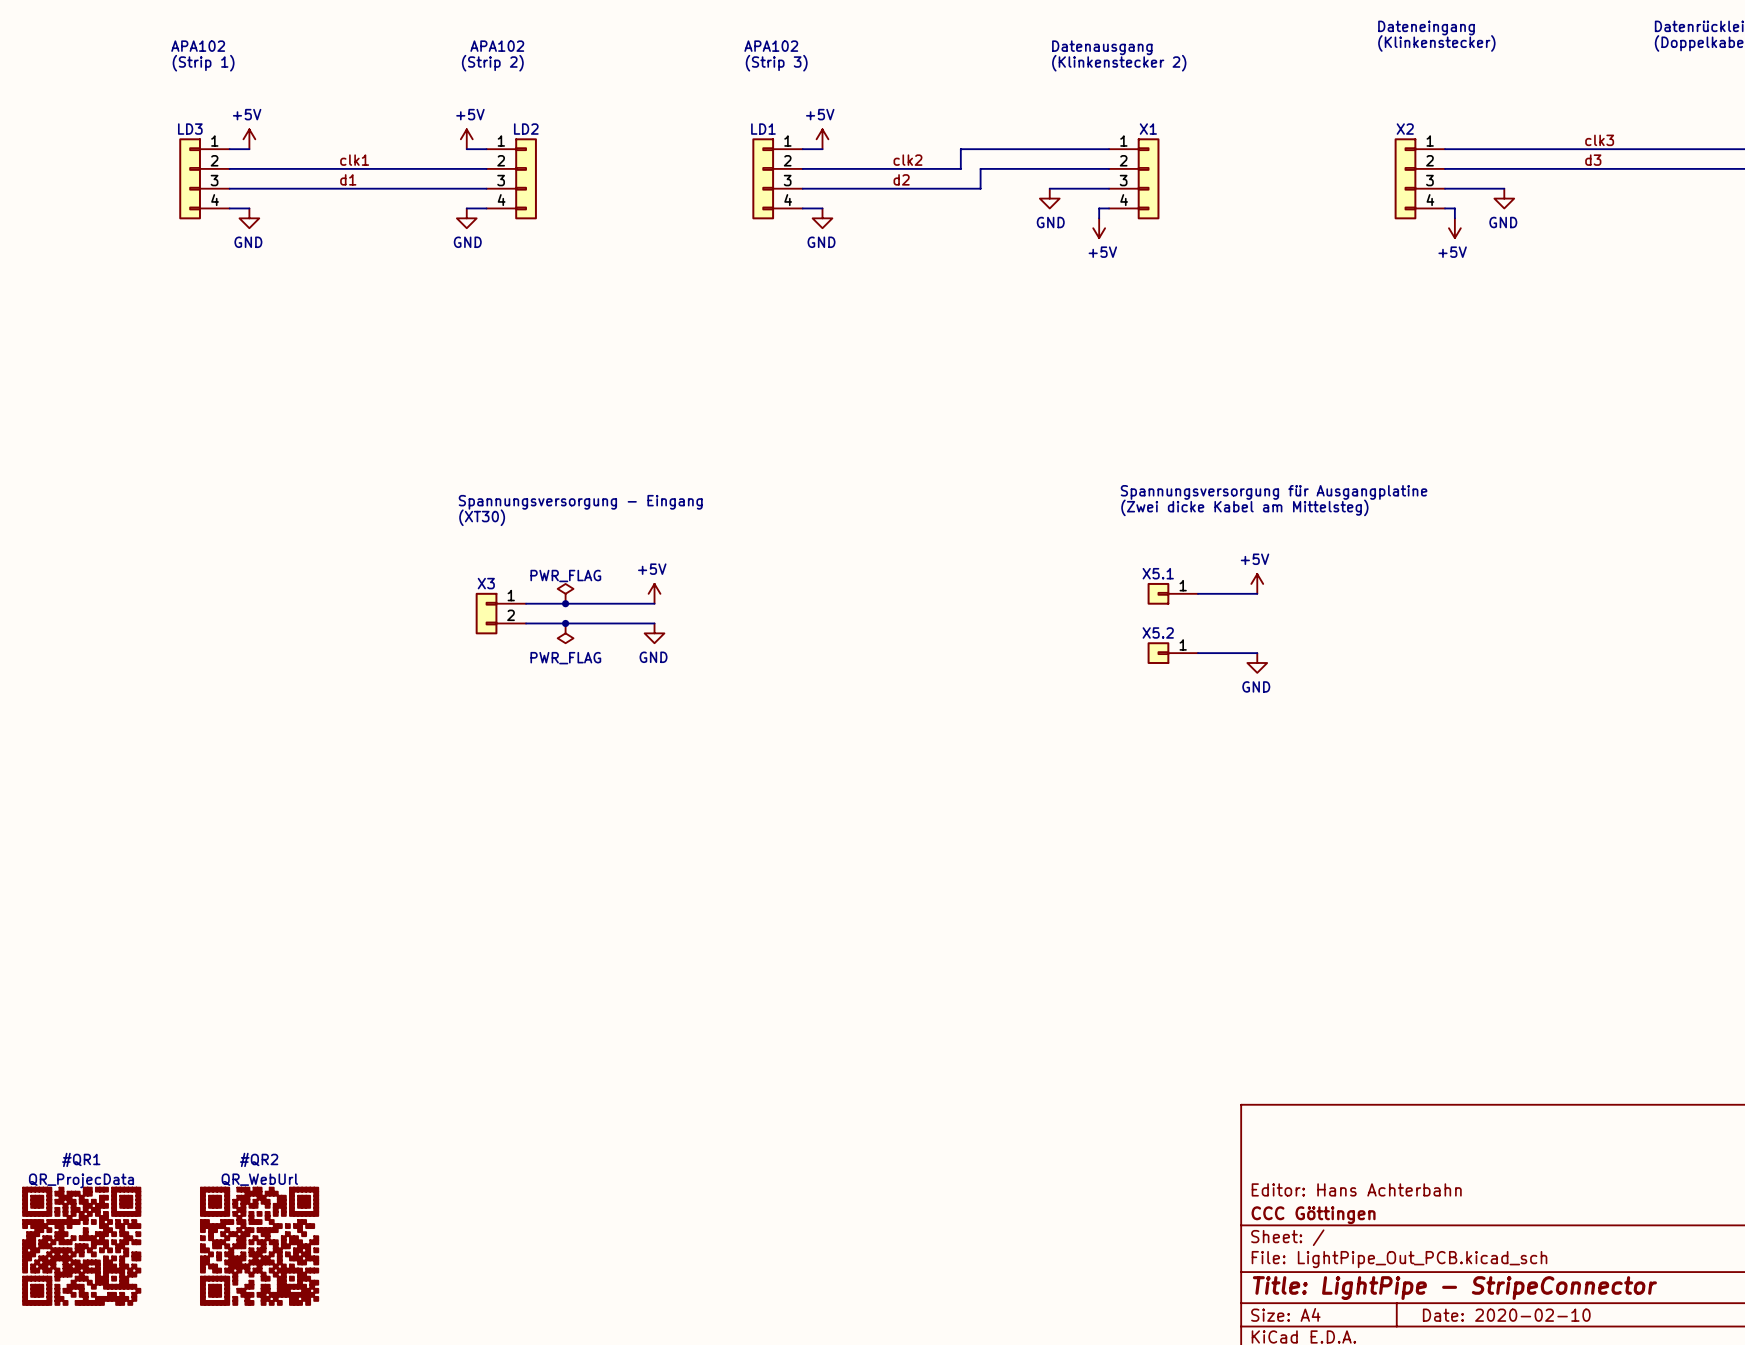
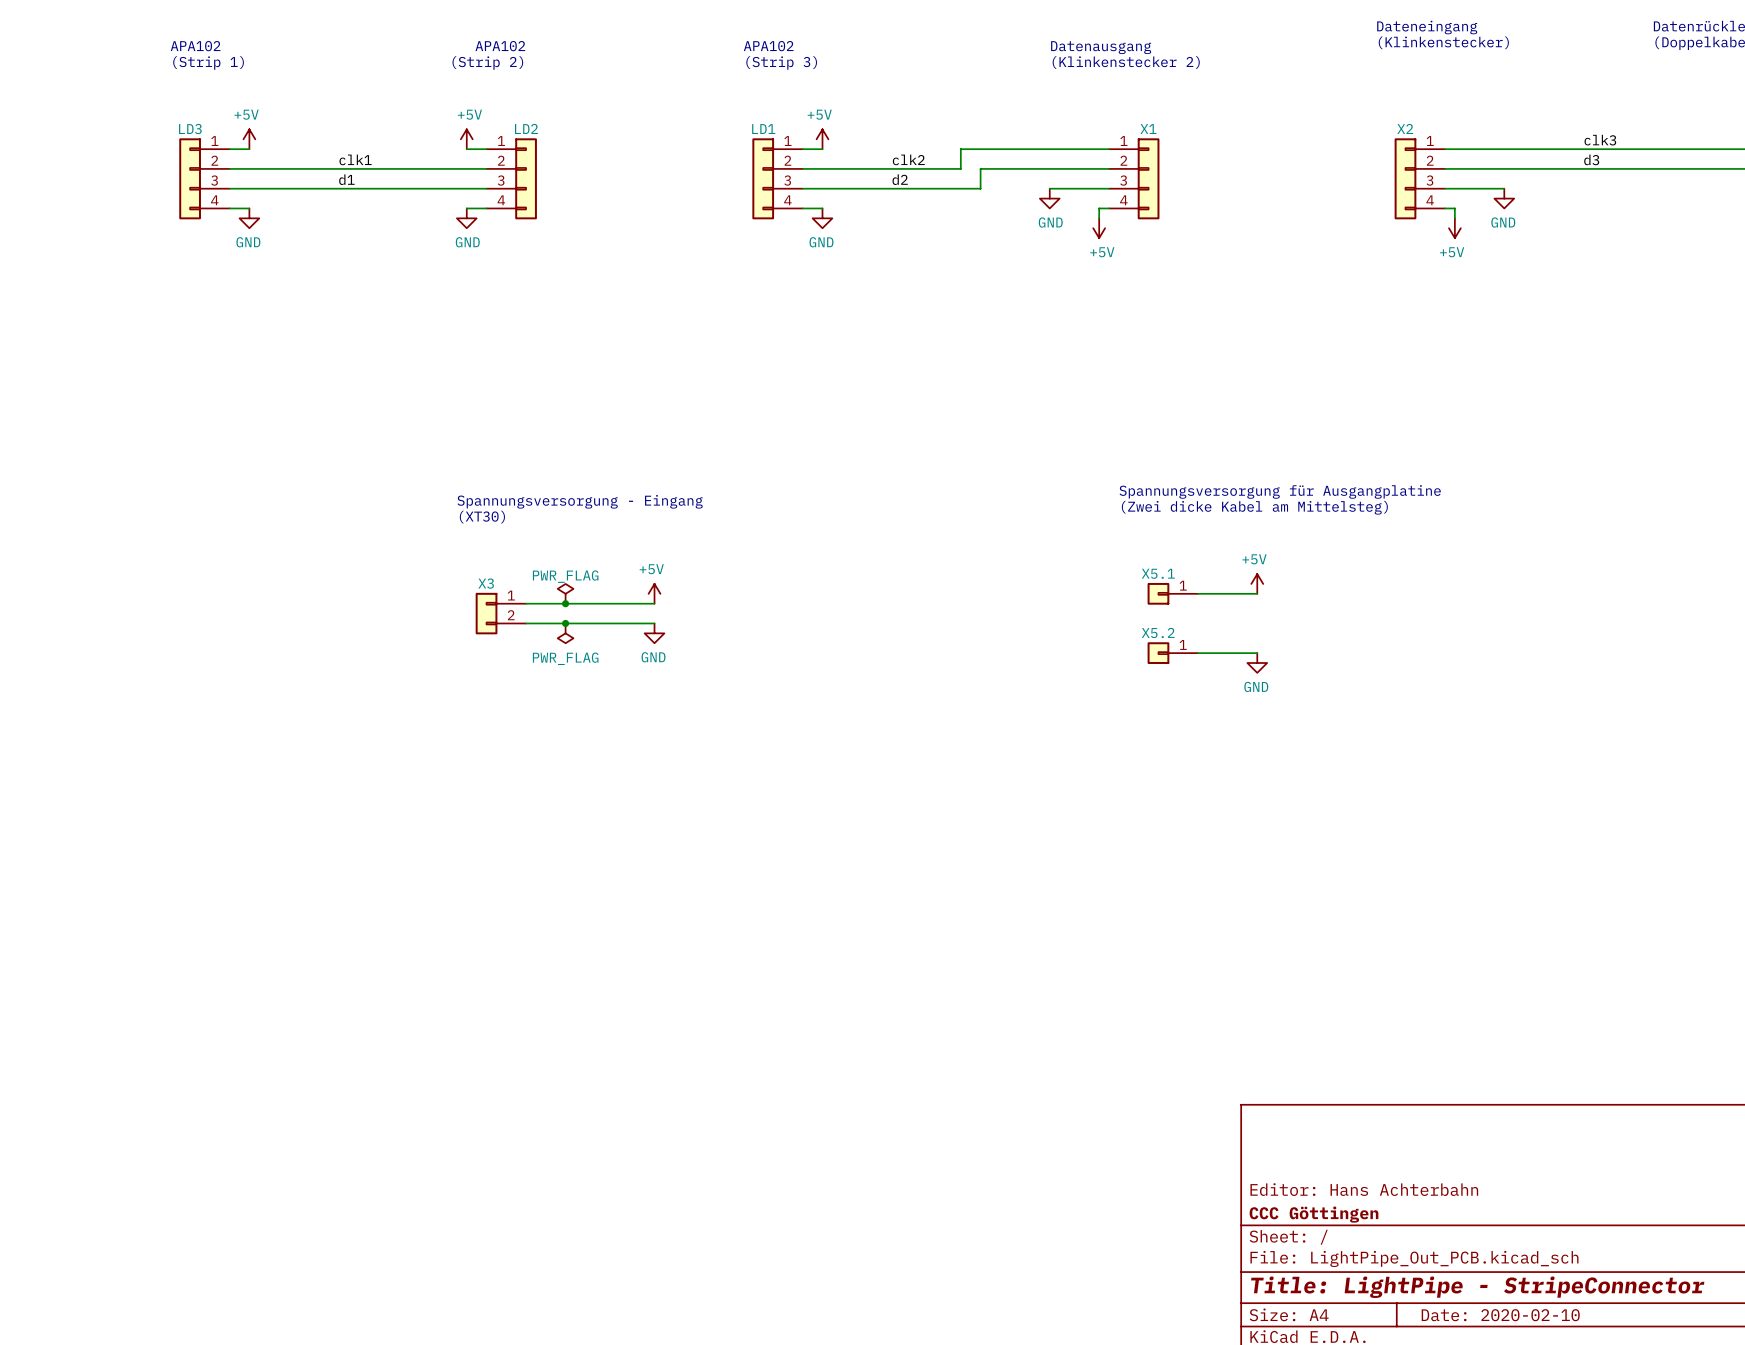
#QR1: QR_ProjecData (81, 1246) -> none
#QR2: QR_WebUrl (259, 1246) -> none

